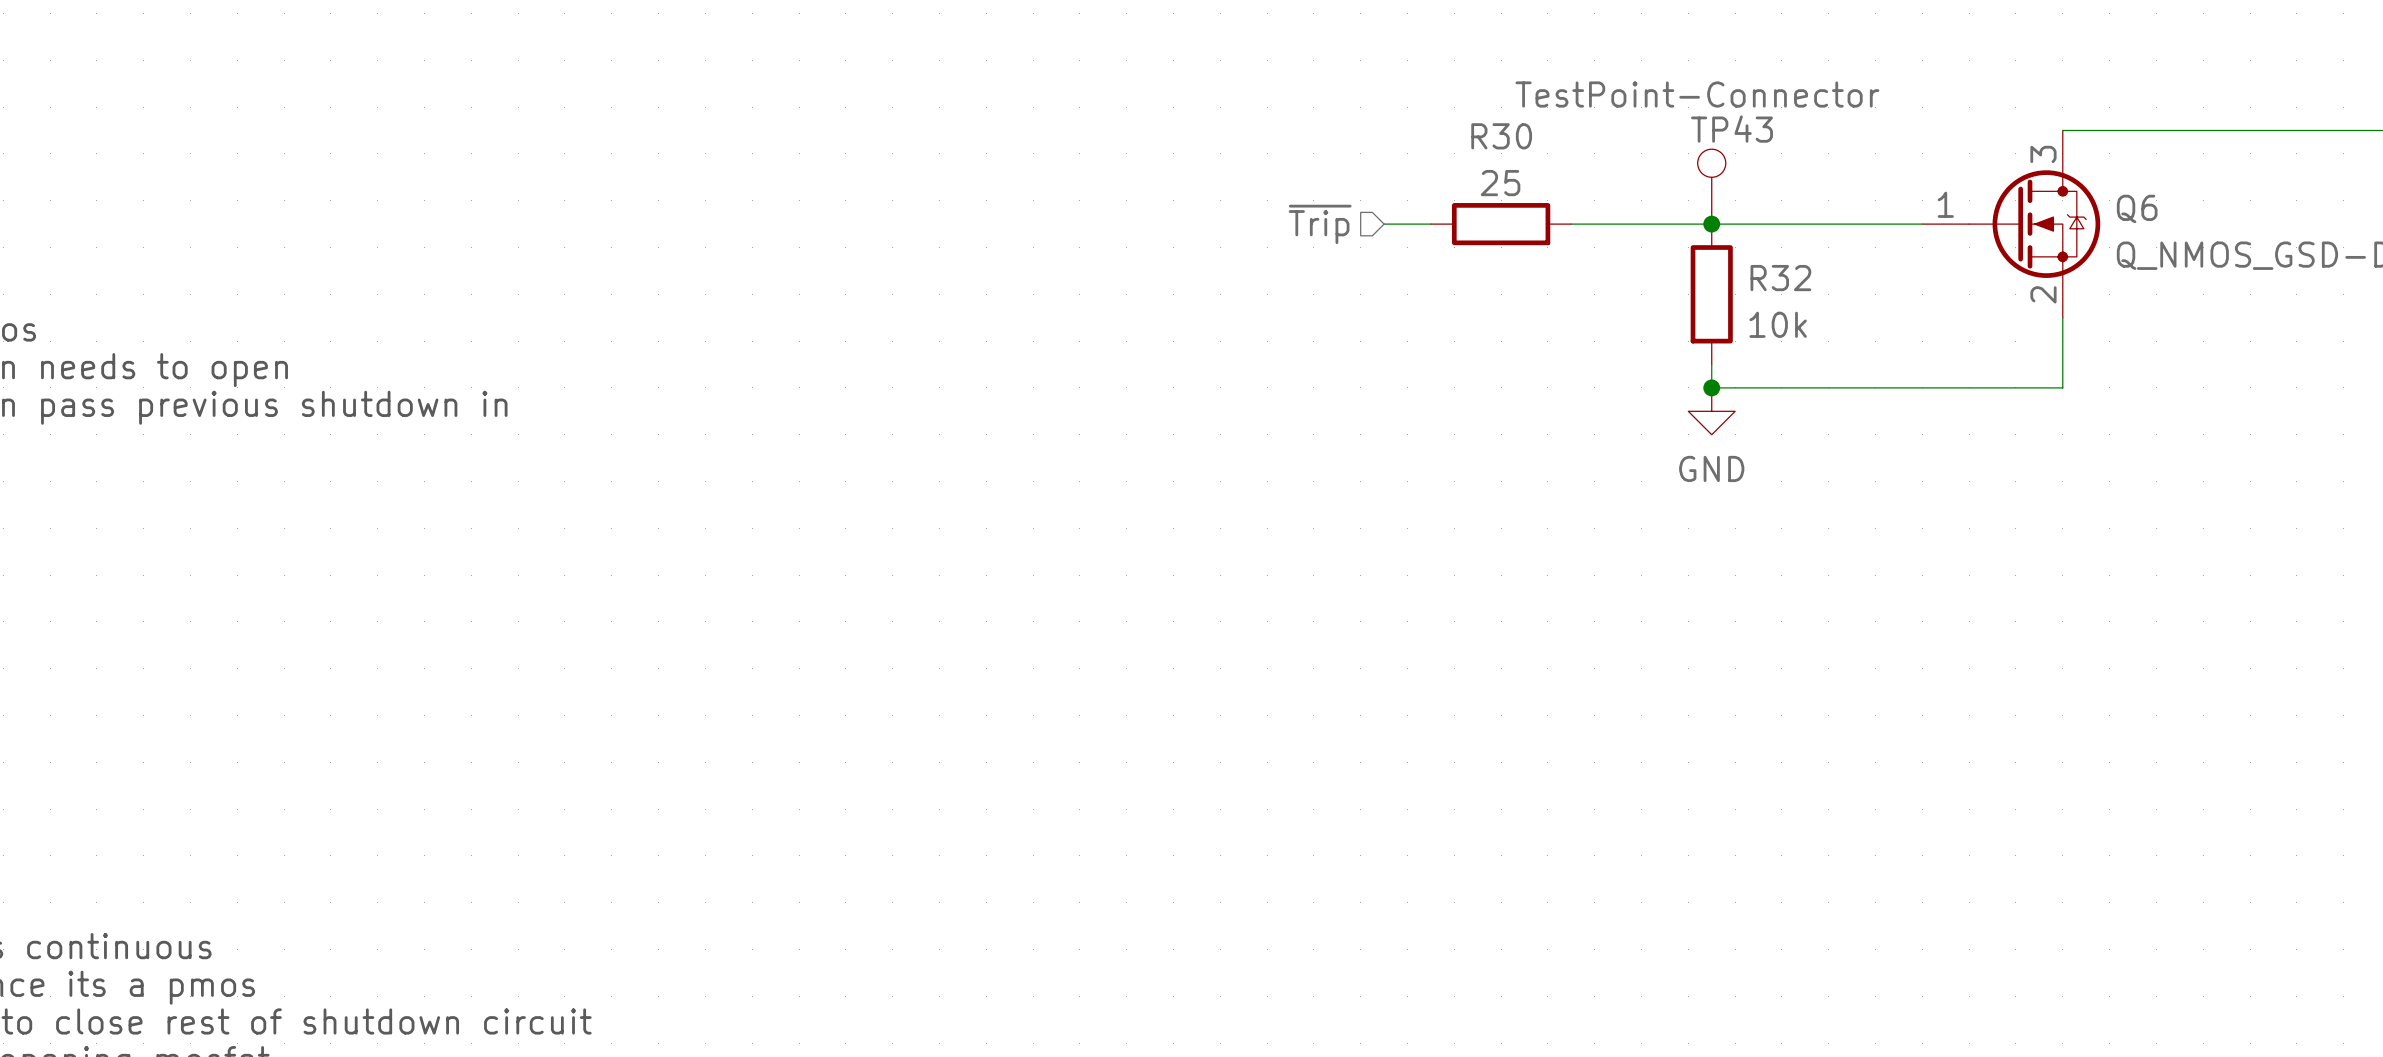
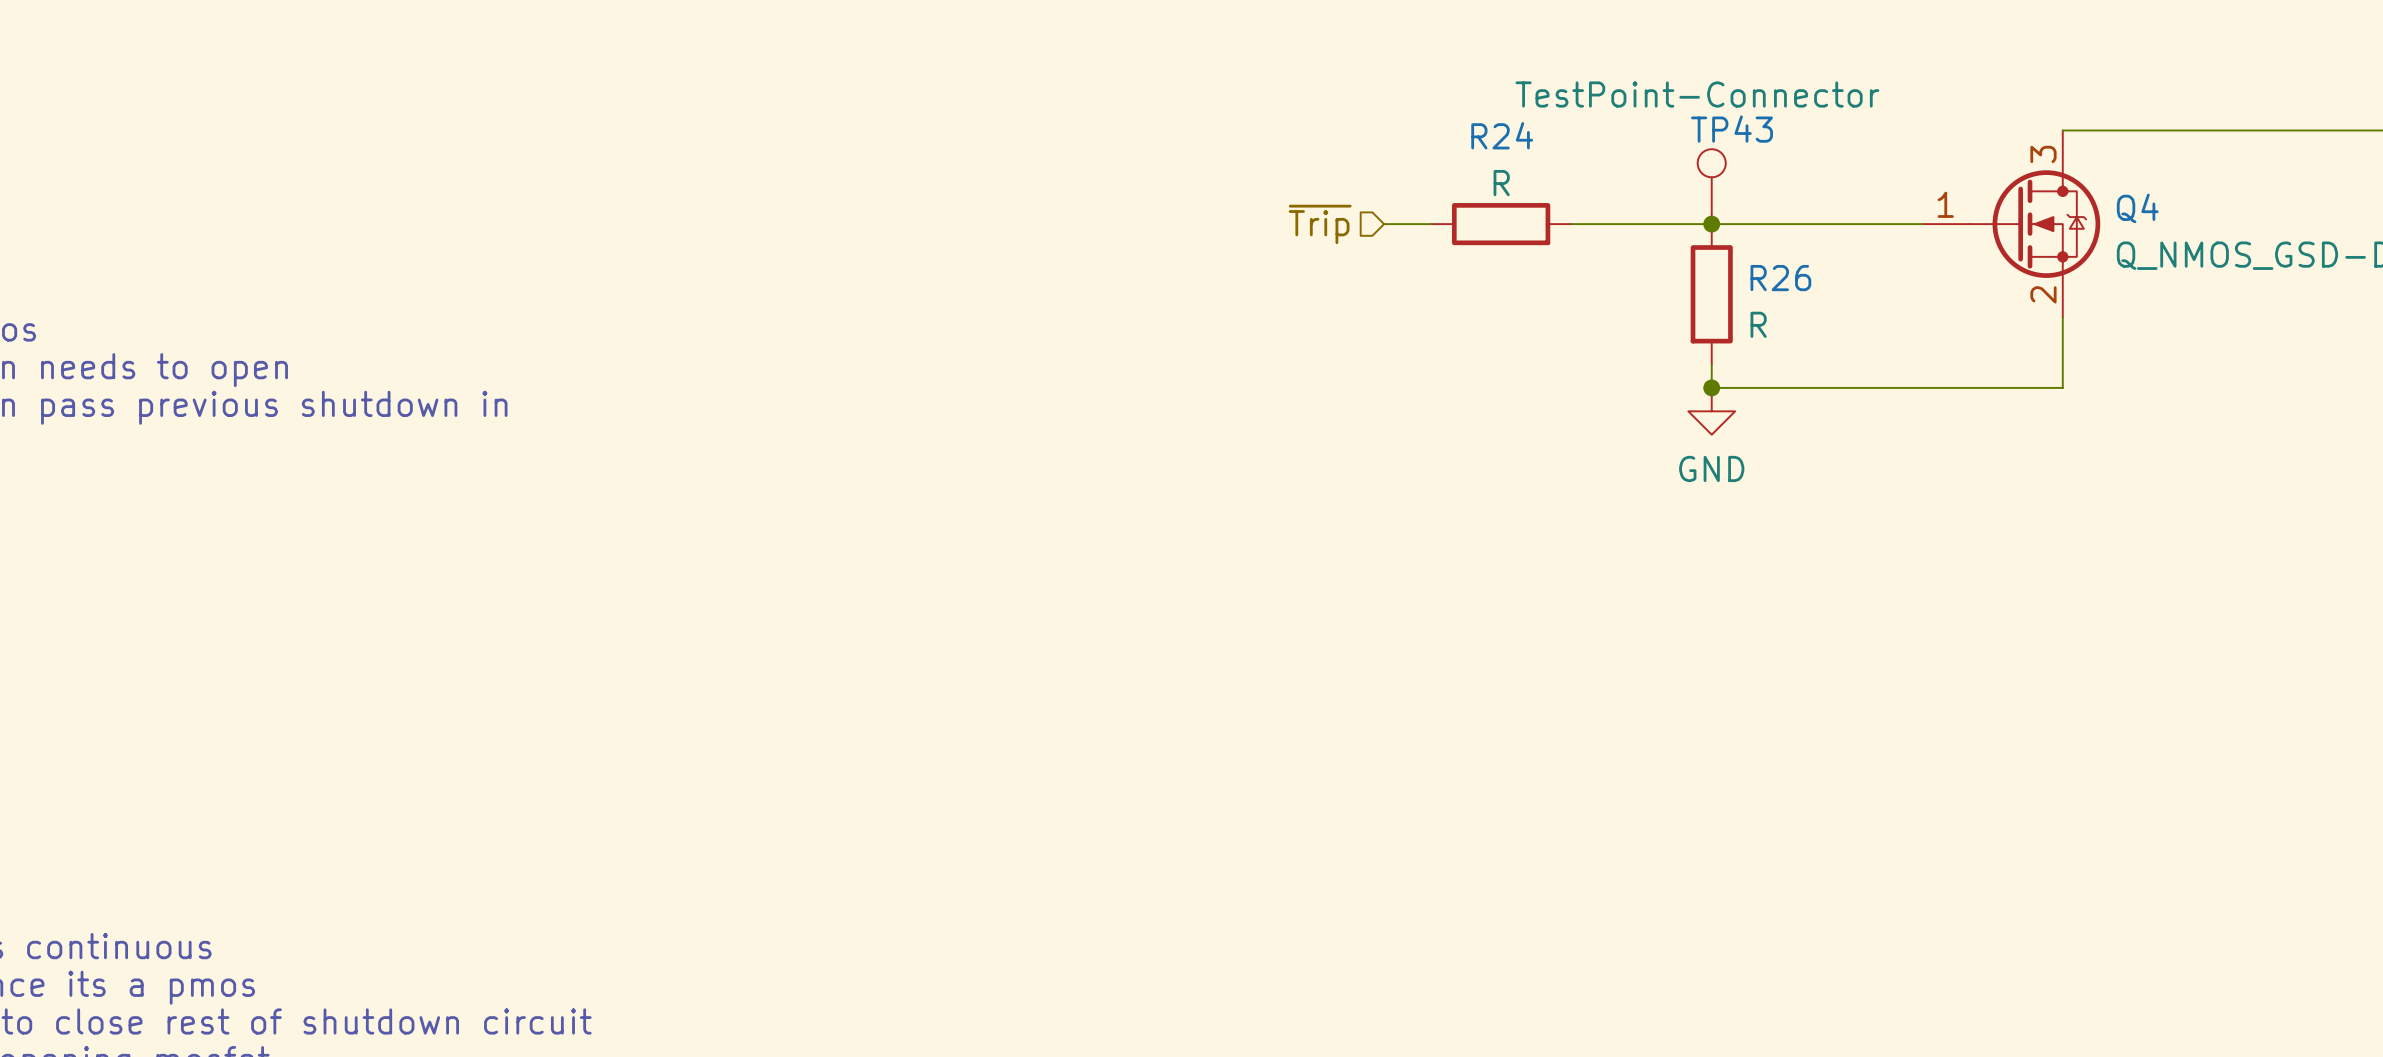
R30 name: R30 (1501, 136) -> R24 (1502, 135)
R30 value: 25 (1500, 183) -> R (1501, 183)
Q6 name: Q6 (2137, 208) -> Q4 (2137, 208)
R32 name: R32 (1780, 278) -> R26 (1780, 278)
R32 value: 10k (1778, 324) -> R (1758, 324)

